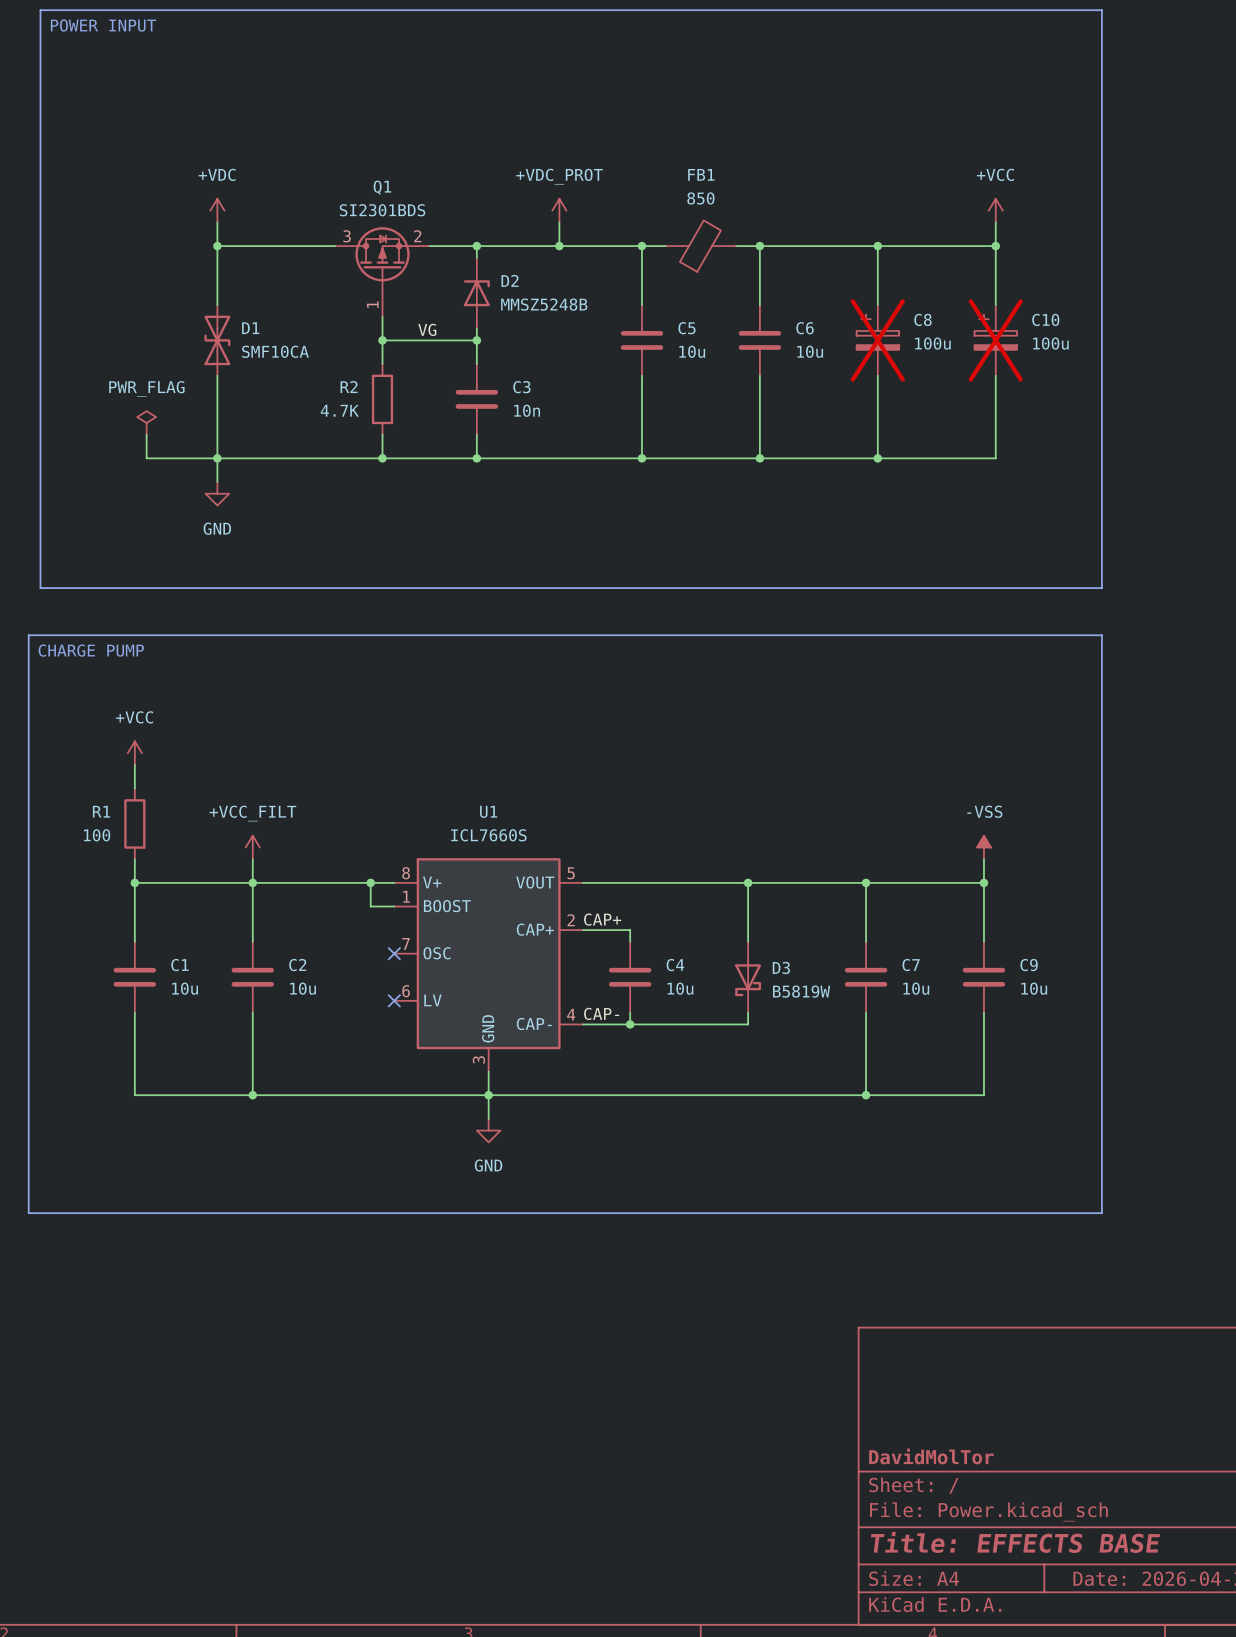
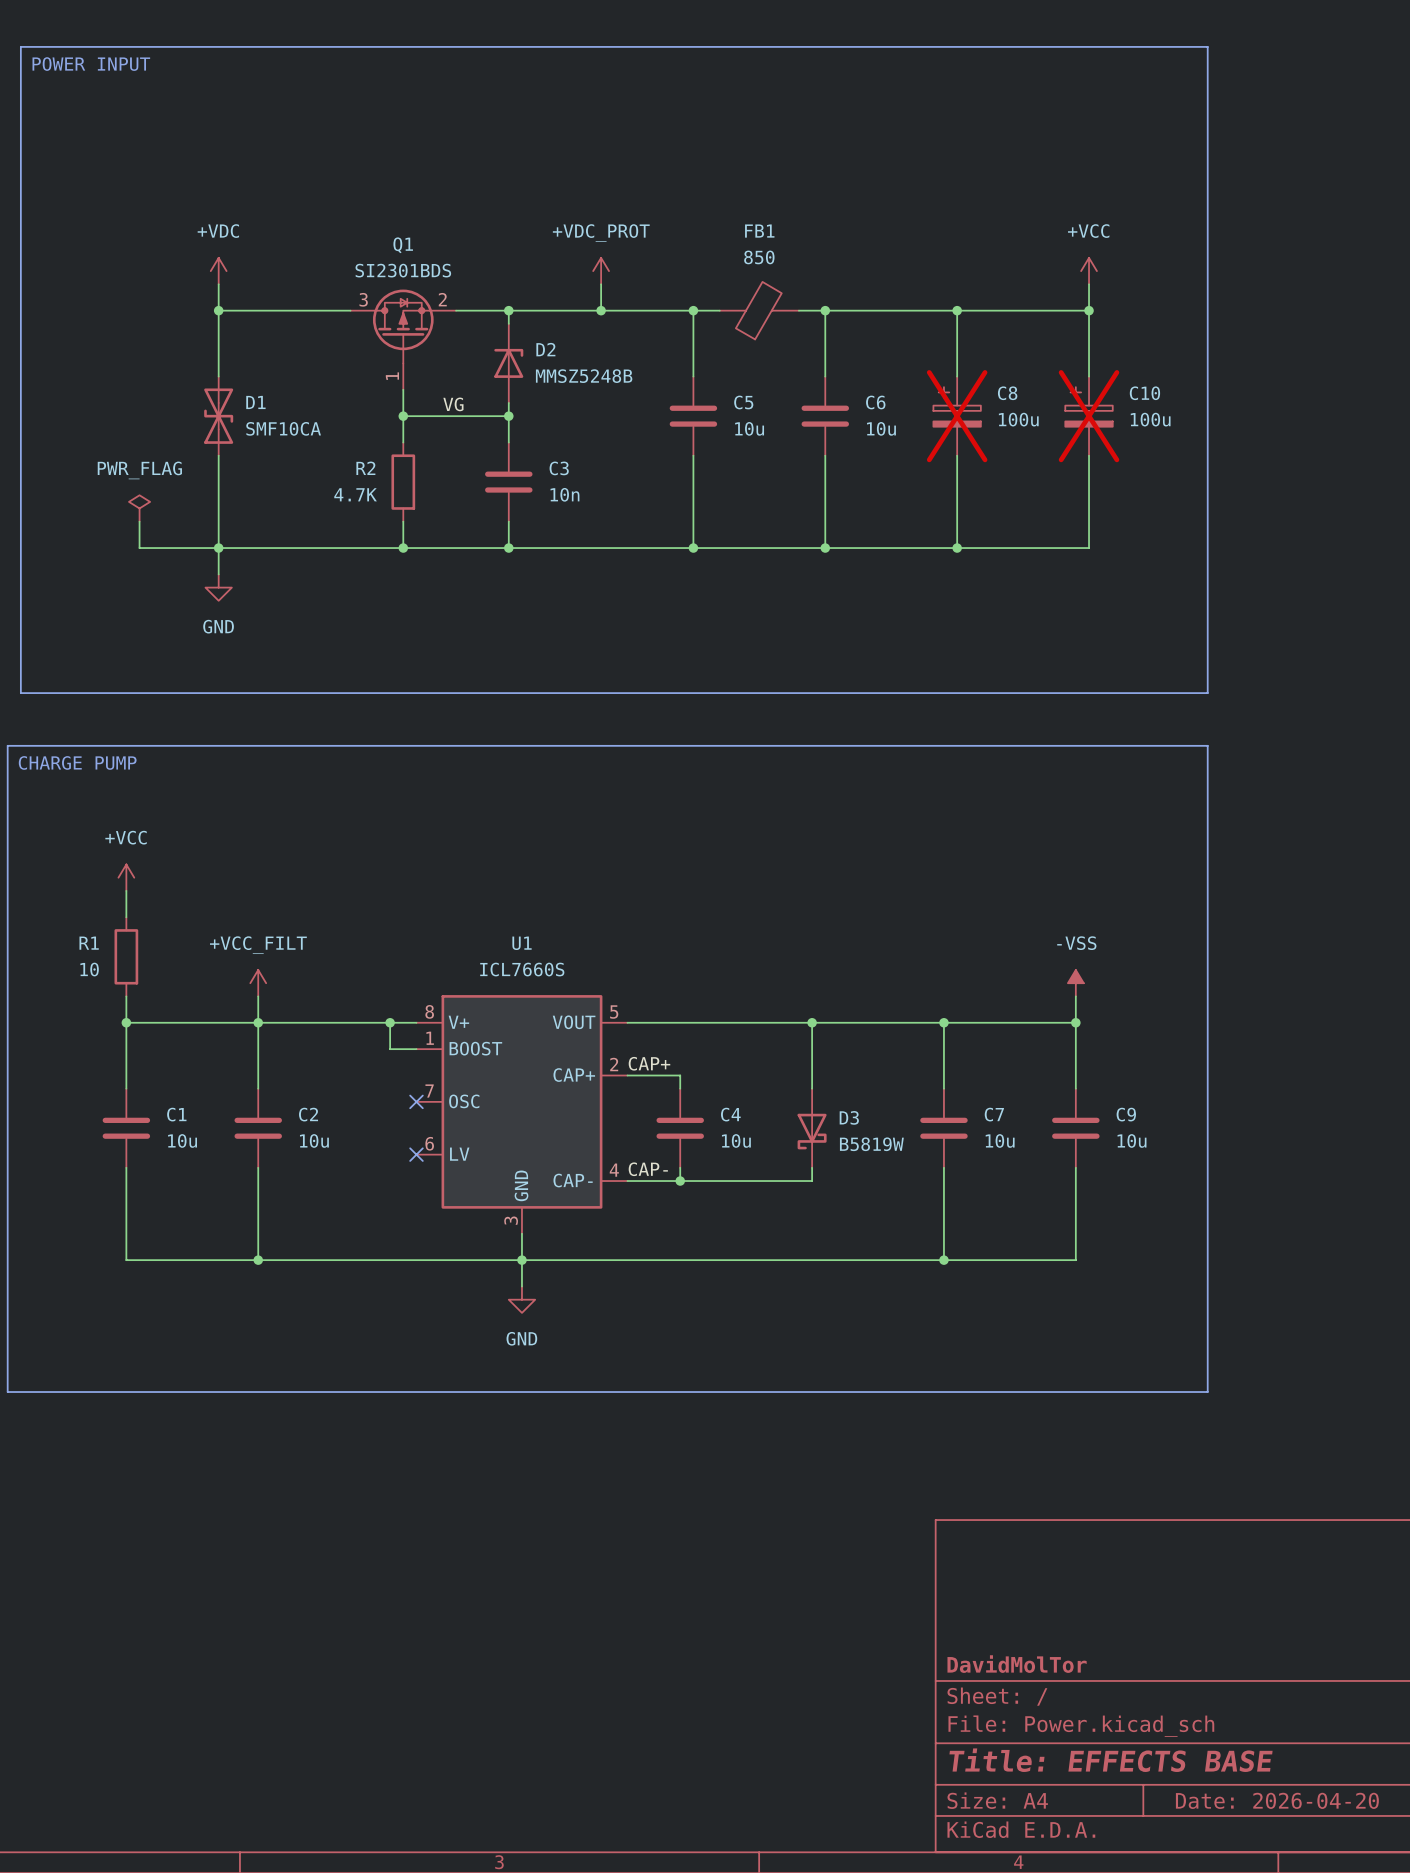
R1 value: 100 (97, 835) -> 10 (89, 969)

